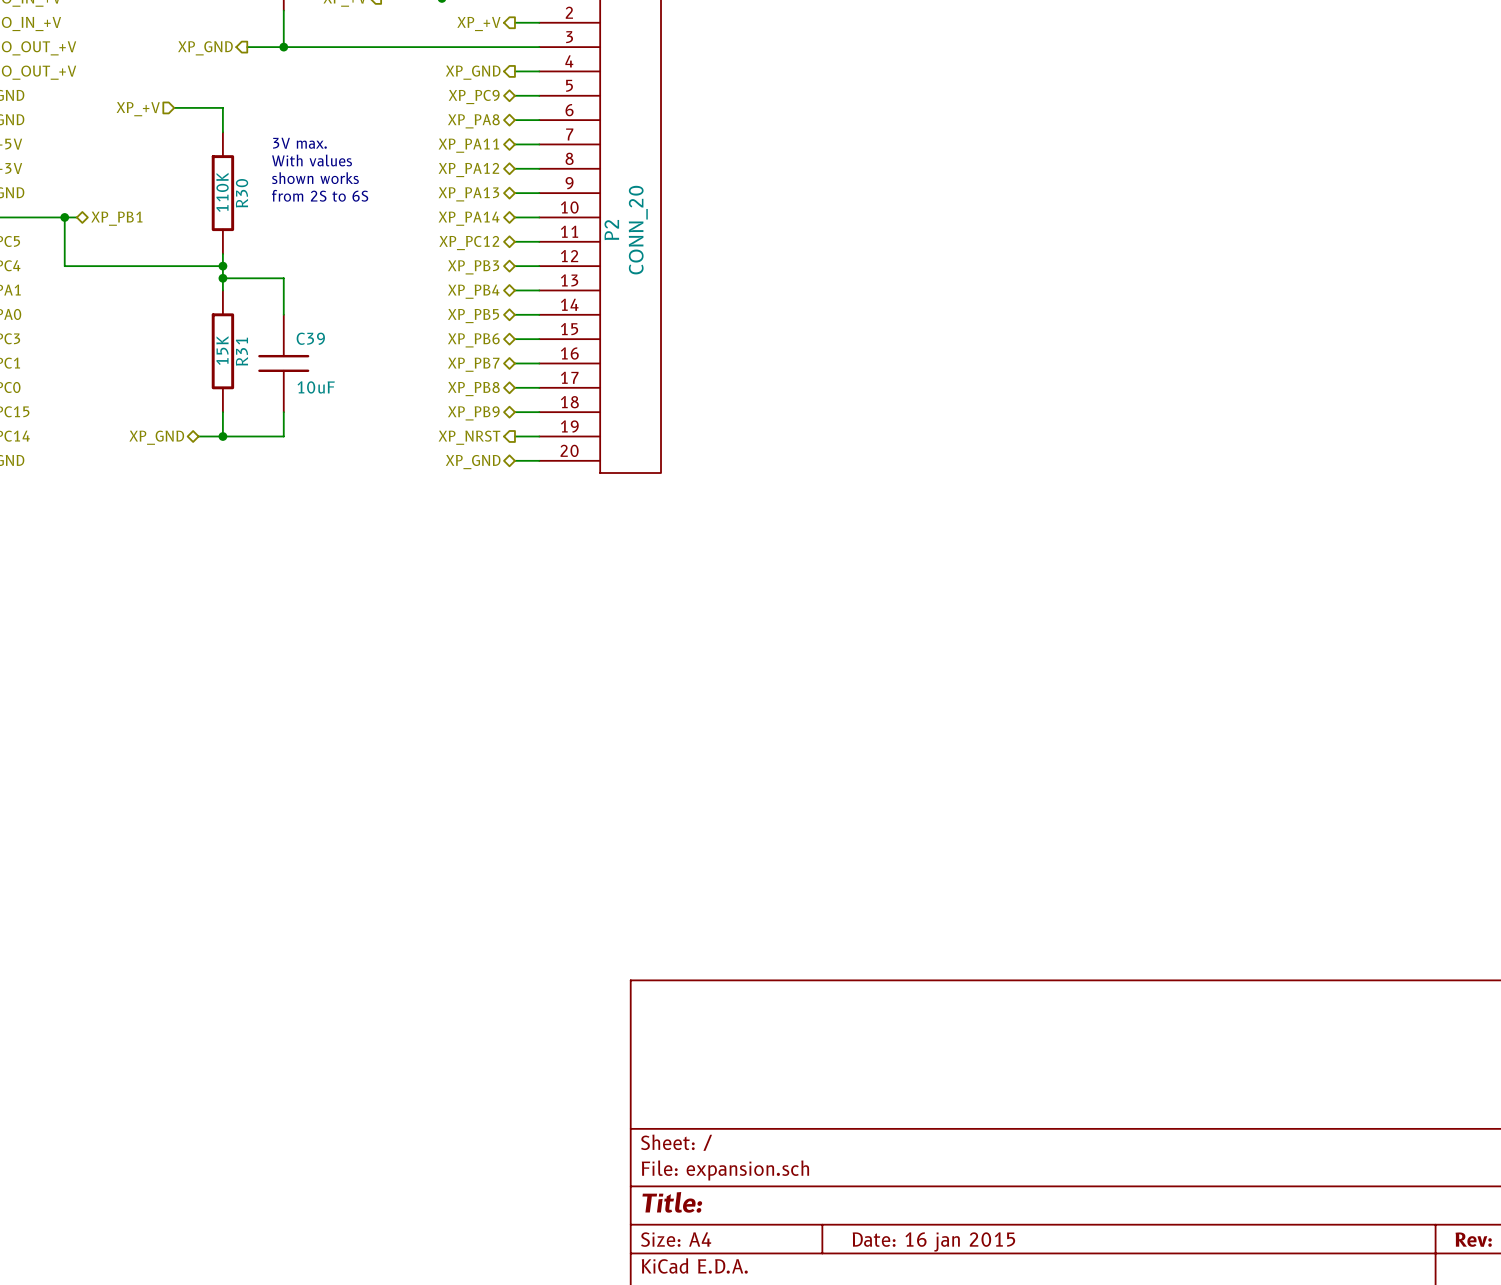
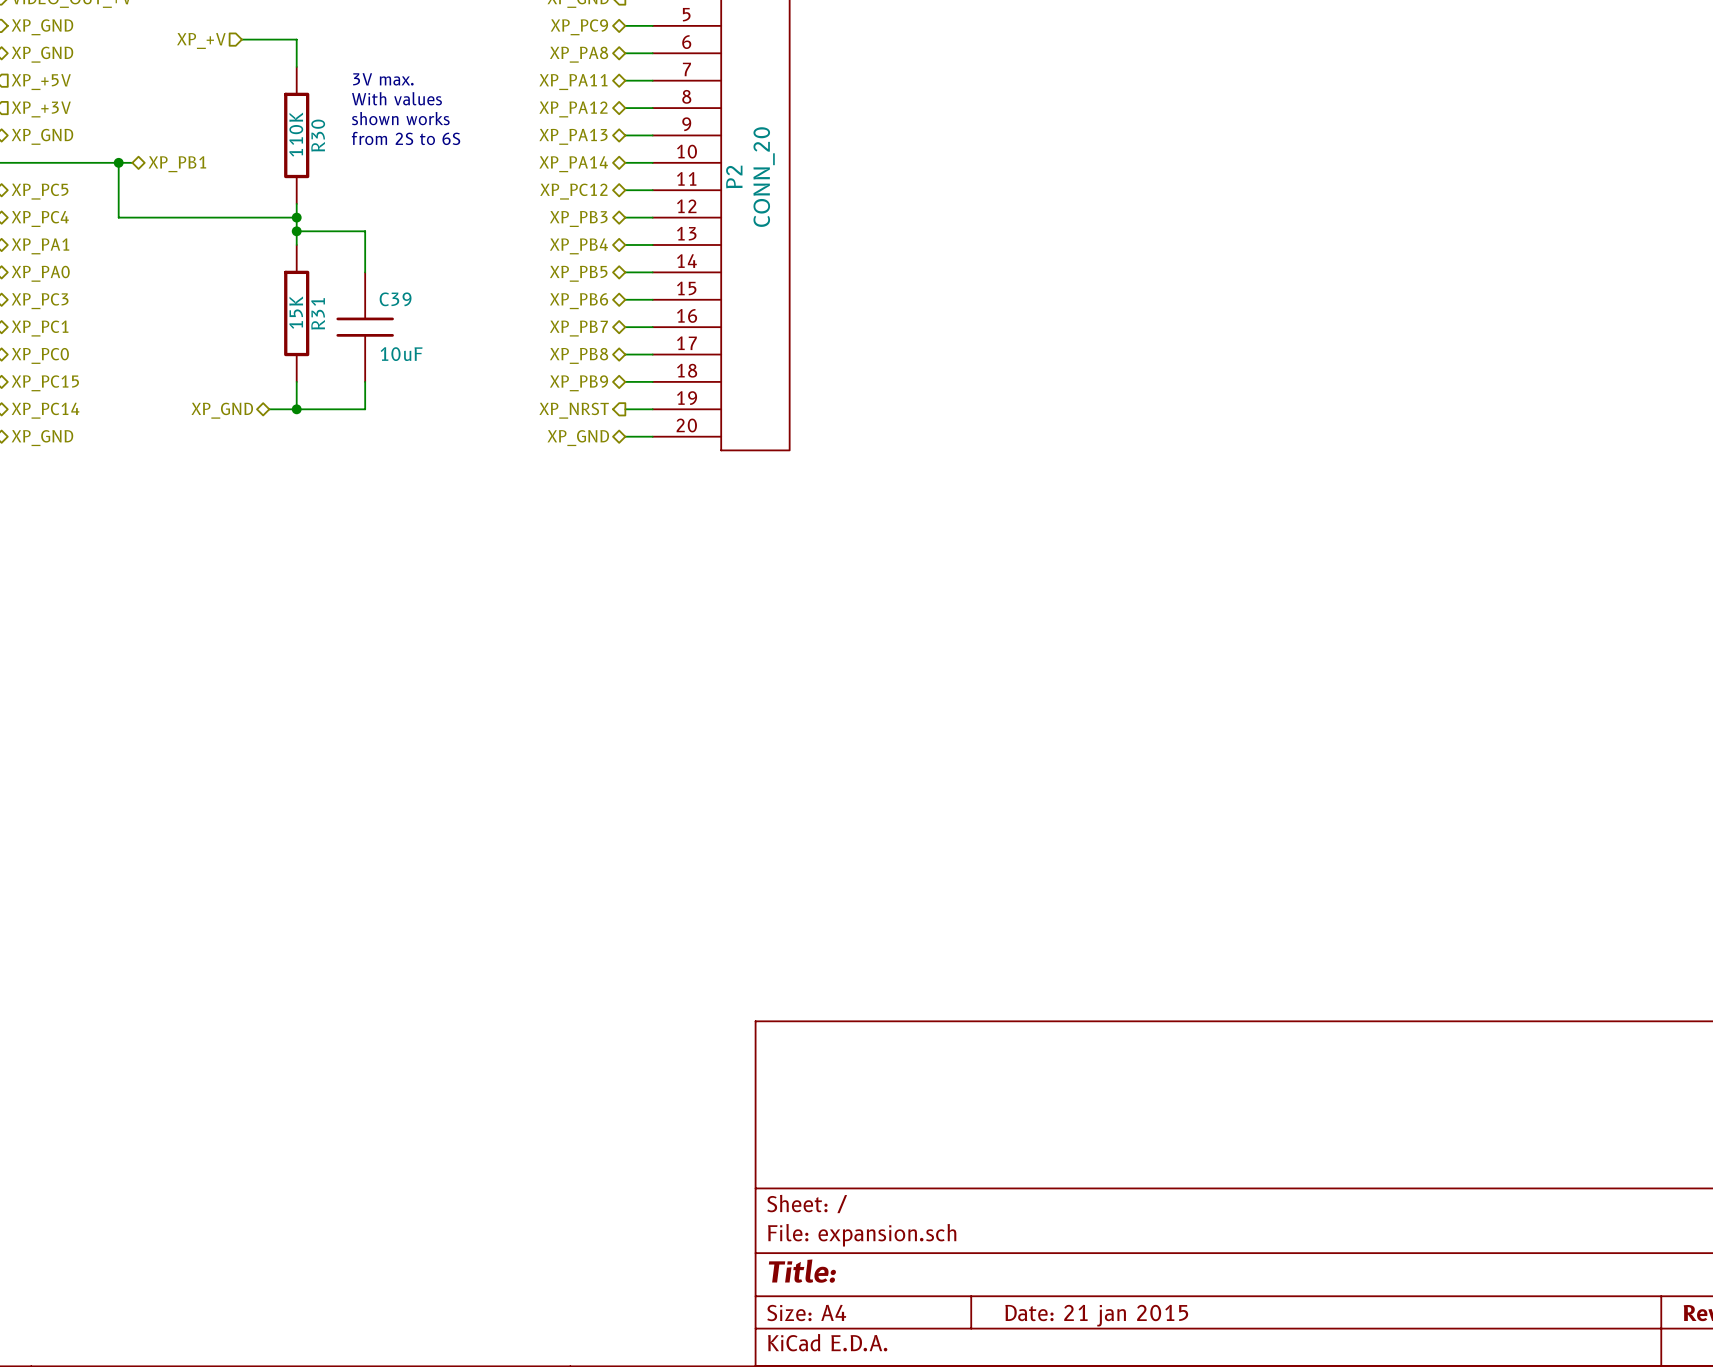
title block: Date: 16 jan 2015 (933, 1241) -> Date: 21 jan 2015 (1096, 1315)

